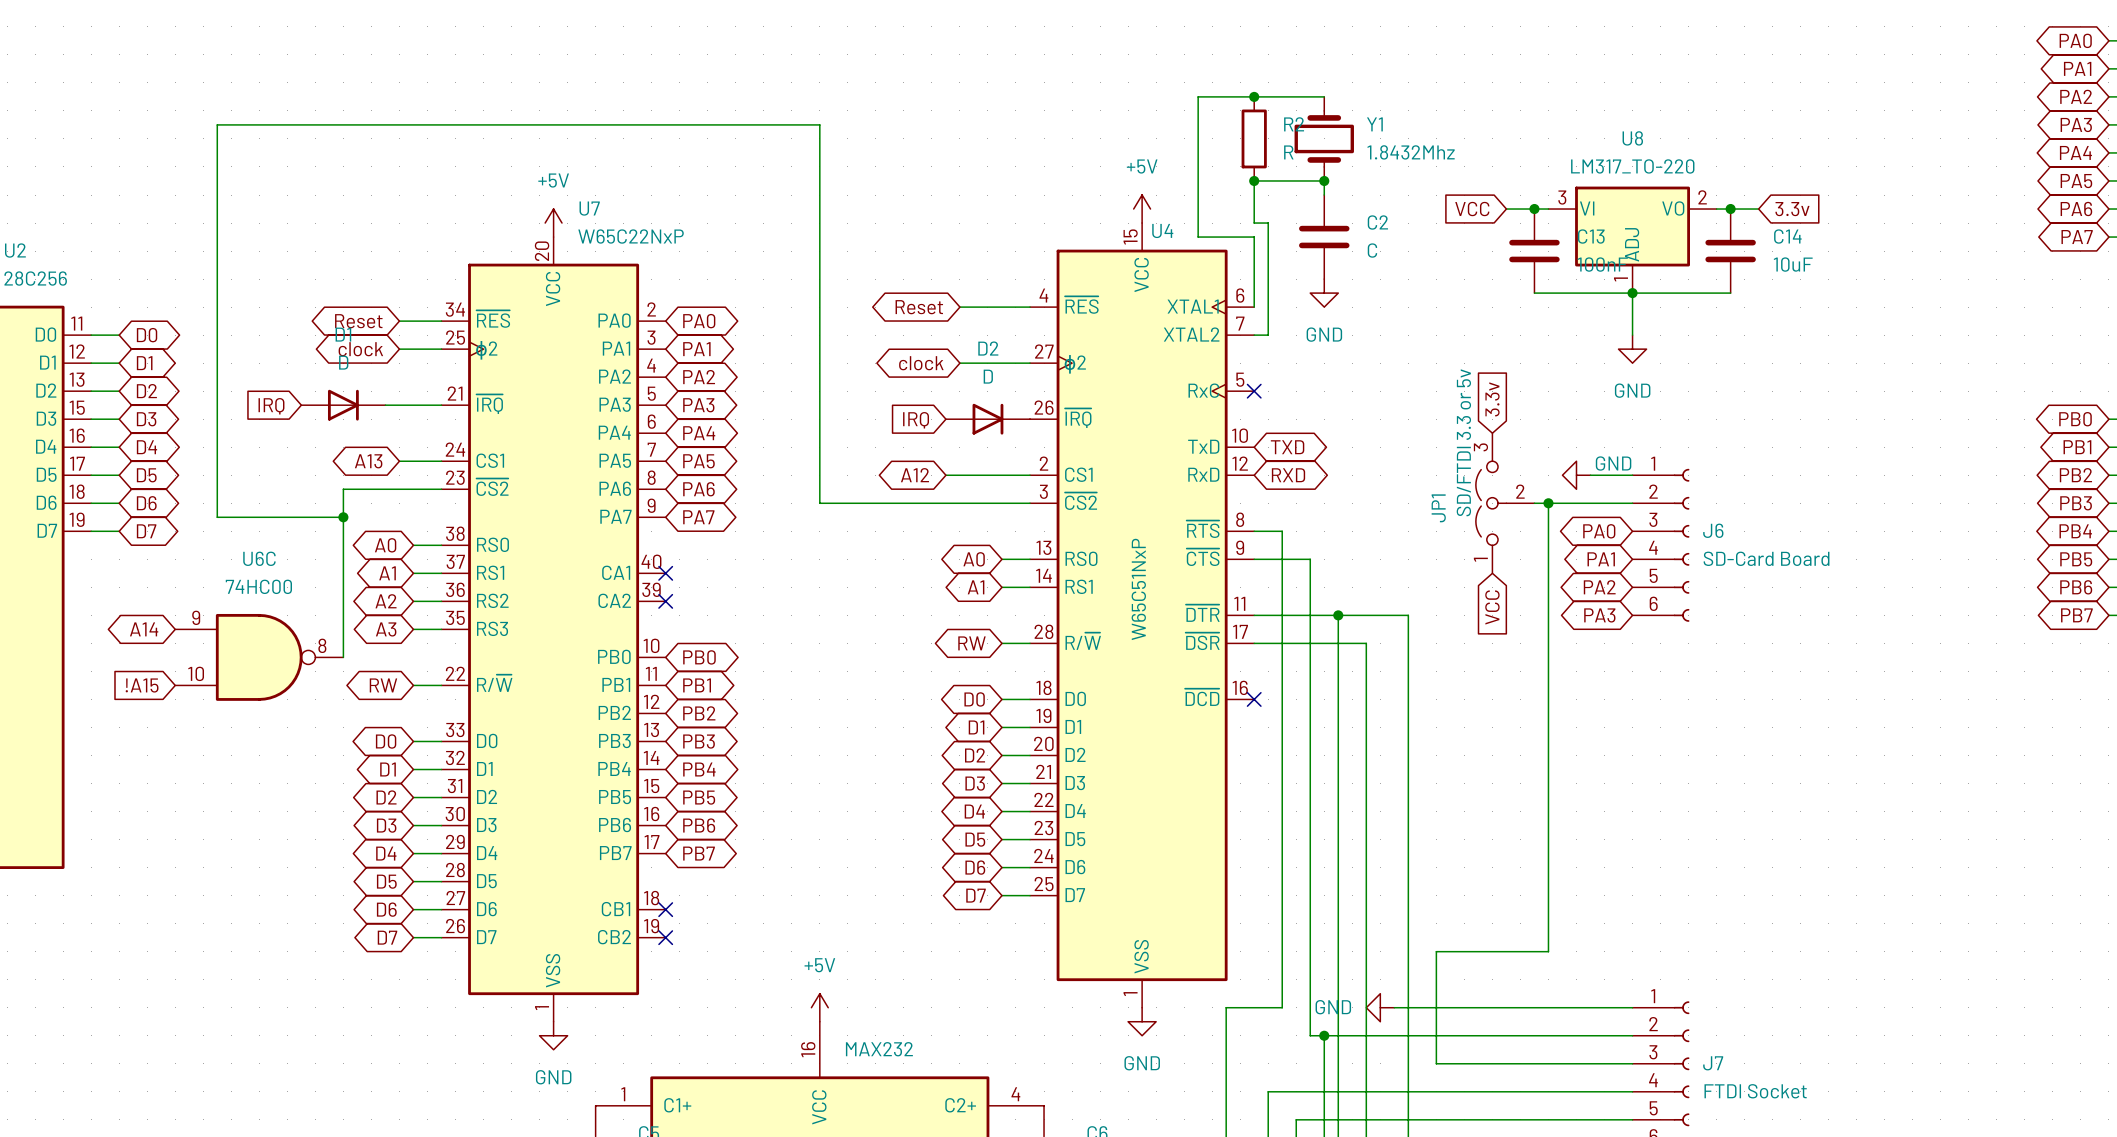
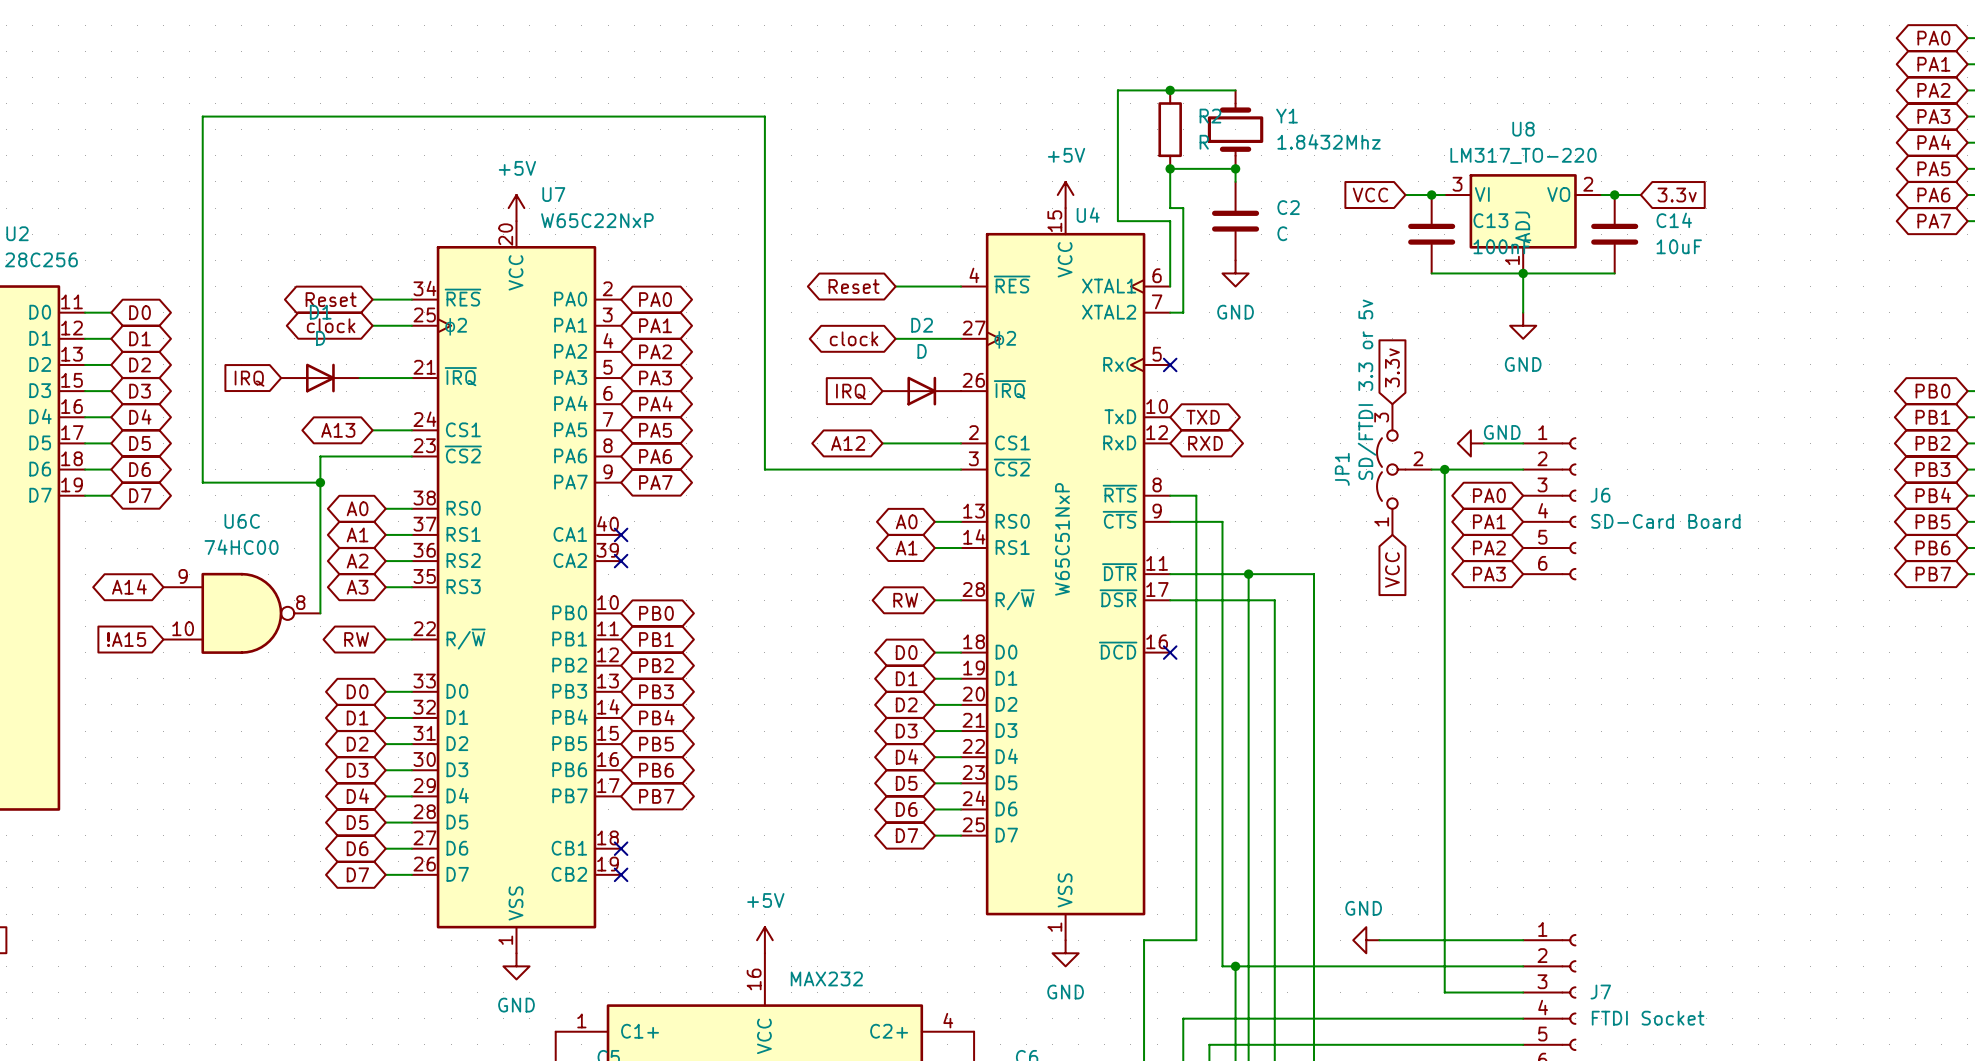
wire: (1548, 951) (1436, 951) (1436, 1063) (1548, 1063) -> (1444, 887) (1444, 992)
power symbol text position: GND (1333, 1007) -> GND (1363, 908)
power symbol position: GND (1380, 1007) -> GND (1366, 940)
wire: (1394, 1007) (1478, 1007) -> none

